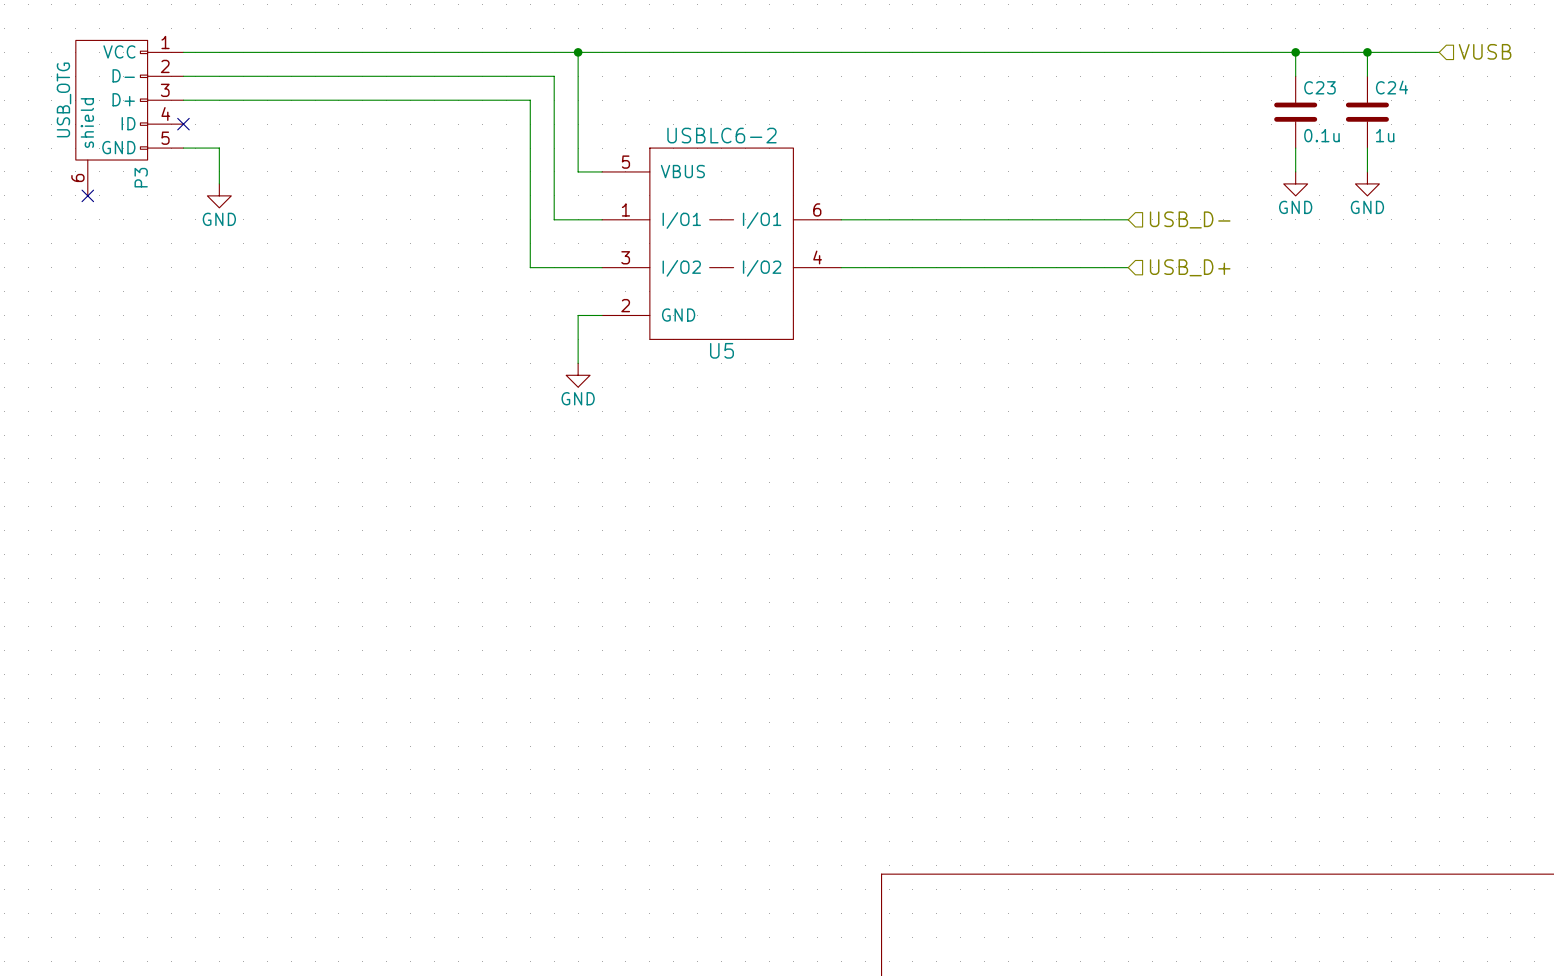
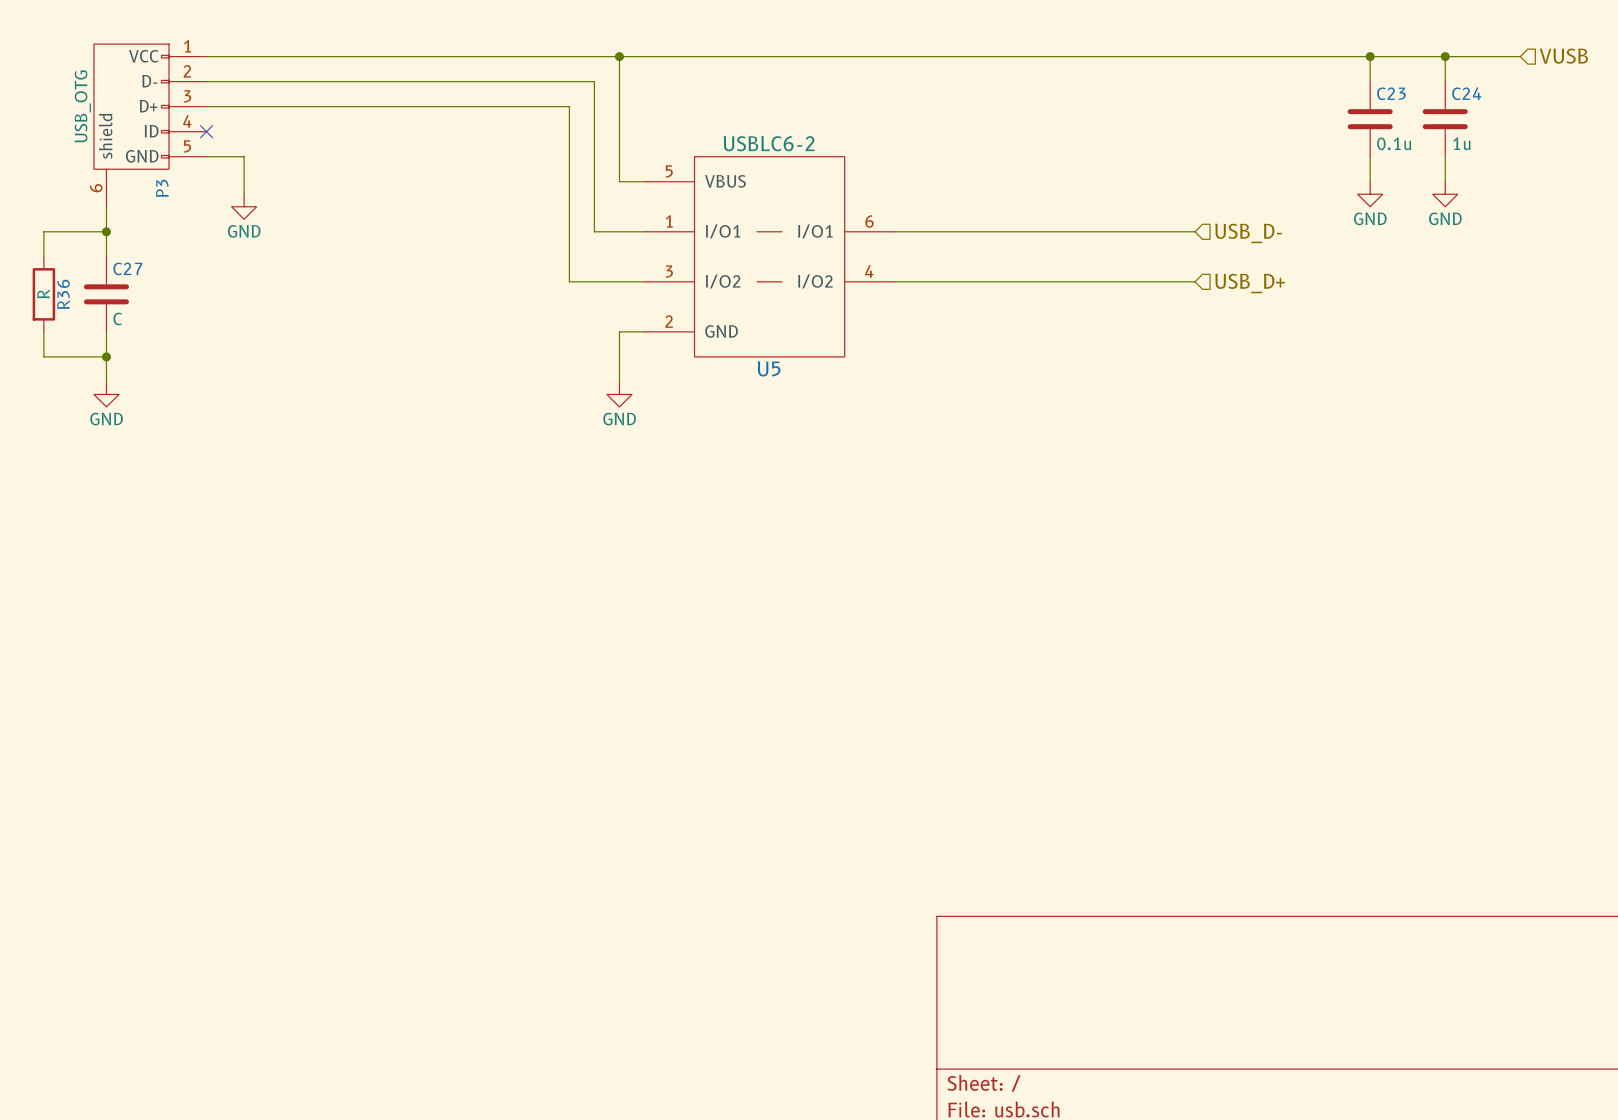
wire: none -> (106, 206) (106, 256)
no-connect mark: (87, 195) -> none
wire: none -> (106, 231) (43, 231) (43, 256)
junction: none -> (106, 231)
R36: none -> R (43, 294)
C27: none -> C (106, 294)
wire: none -> (43, 331) (43, 356) (106, 356)
wire: none -> (106, 331) (106, 381)
junction: none -> (106, 356)
power symbol: none -> GND (106, 394)

